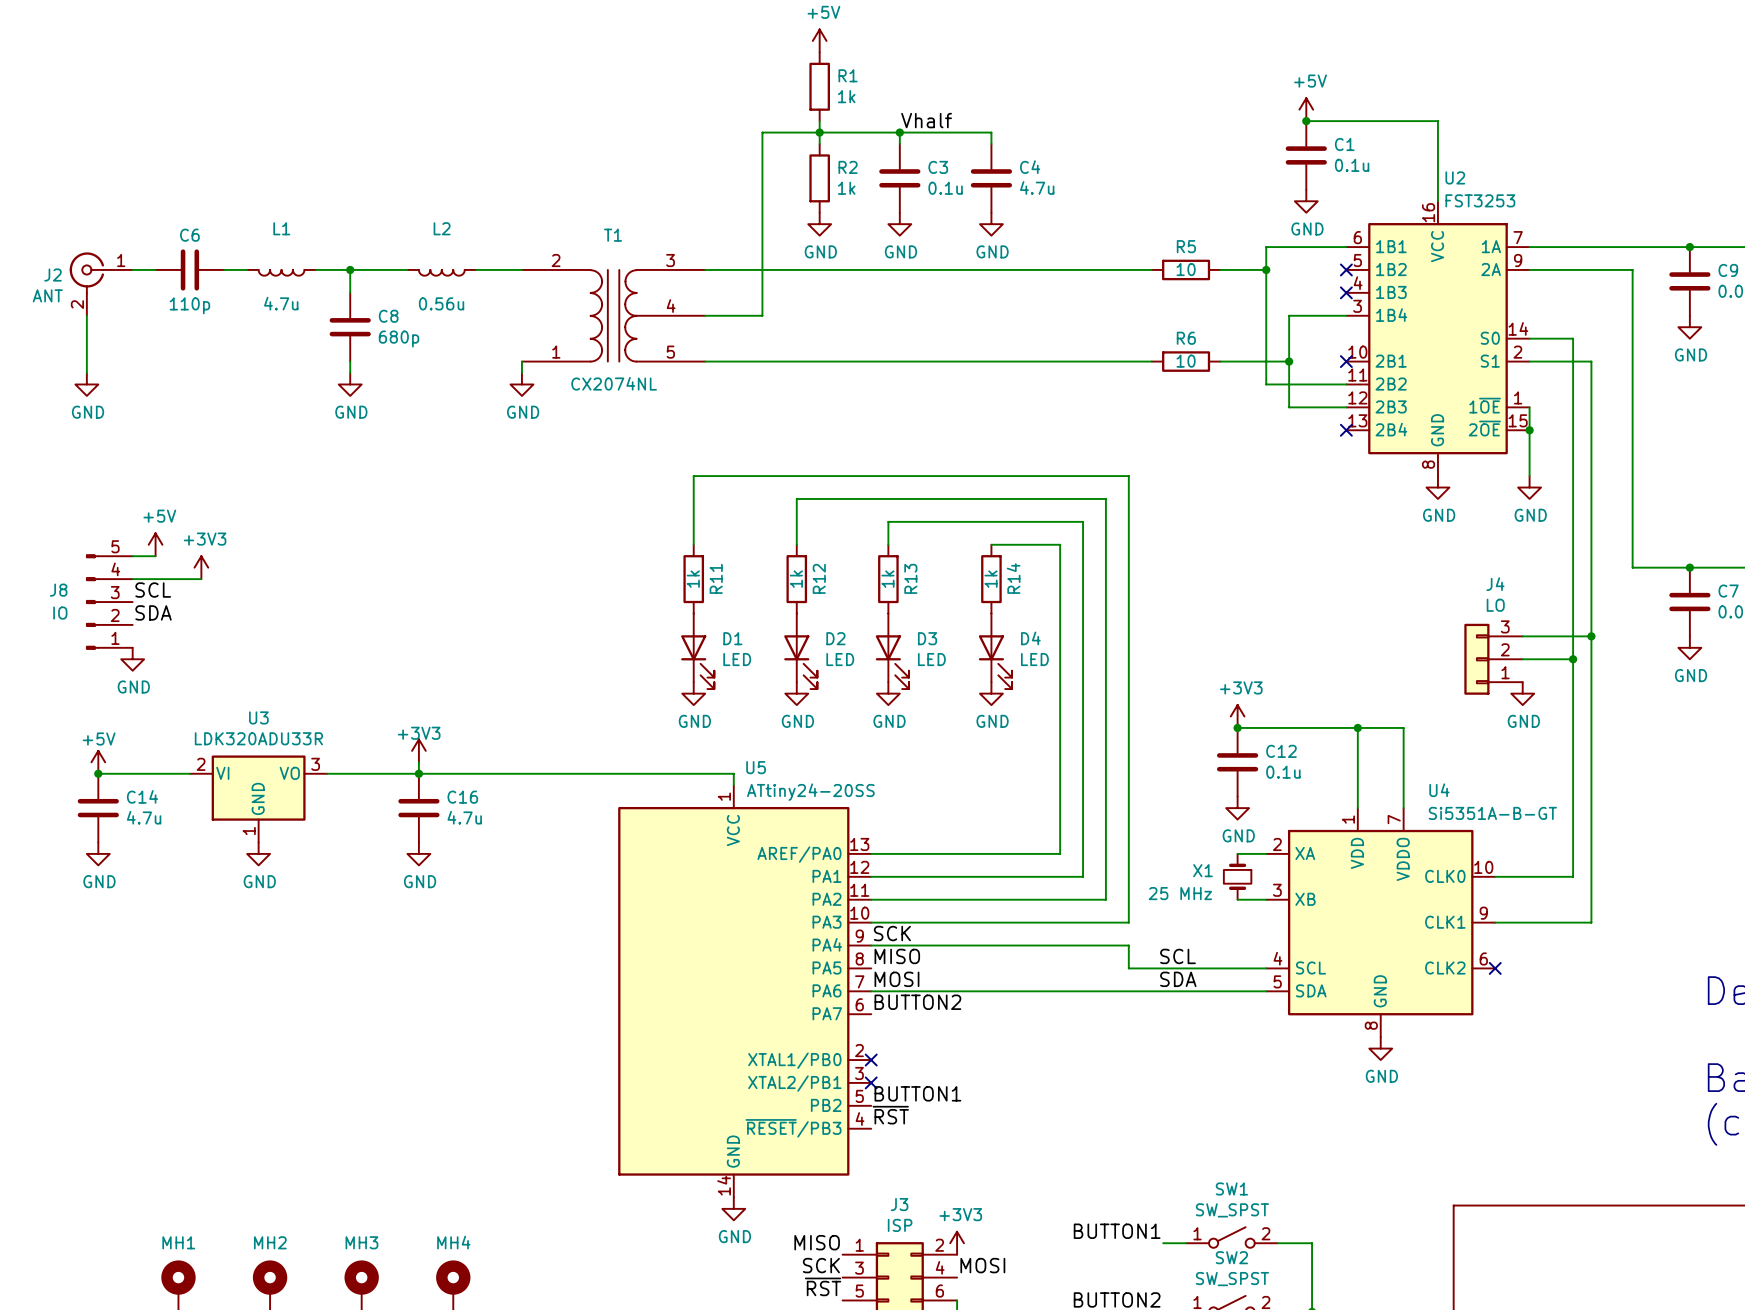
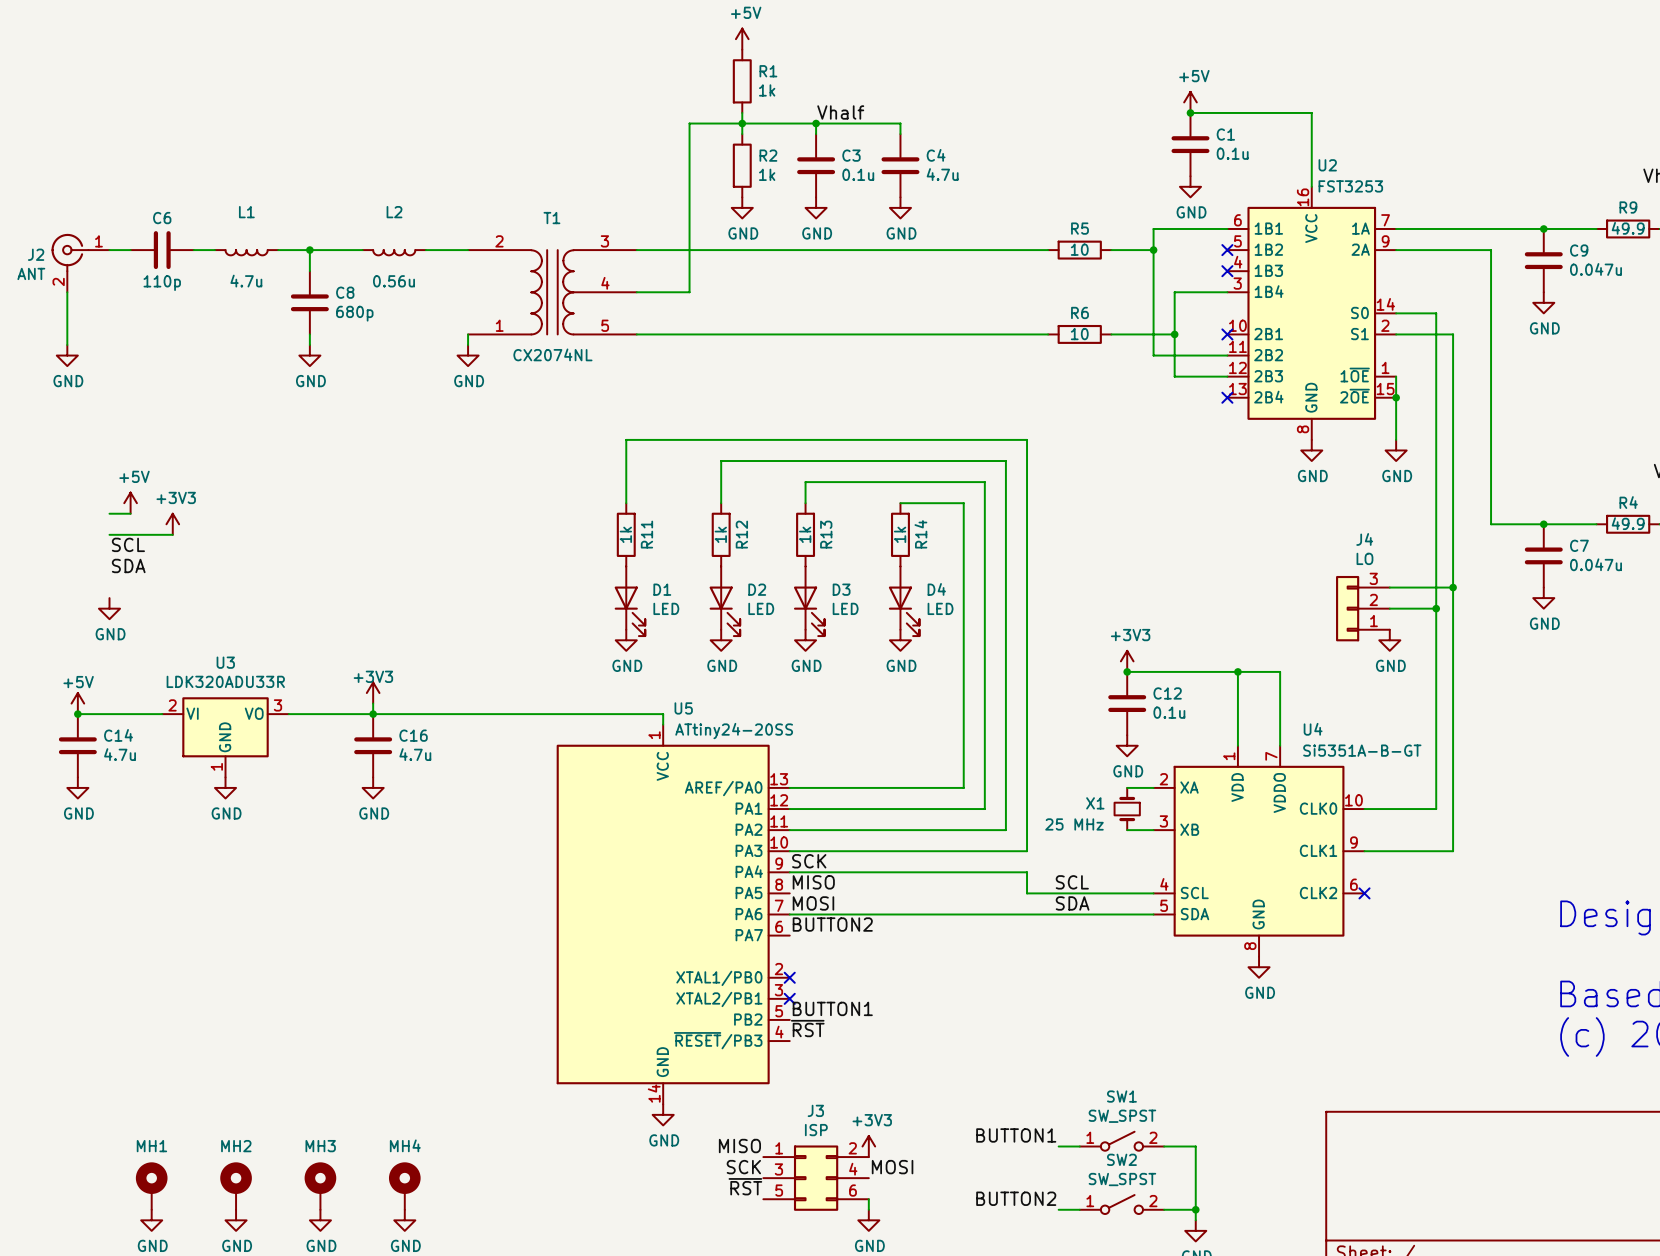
J8: IO (109, 602) -> none

